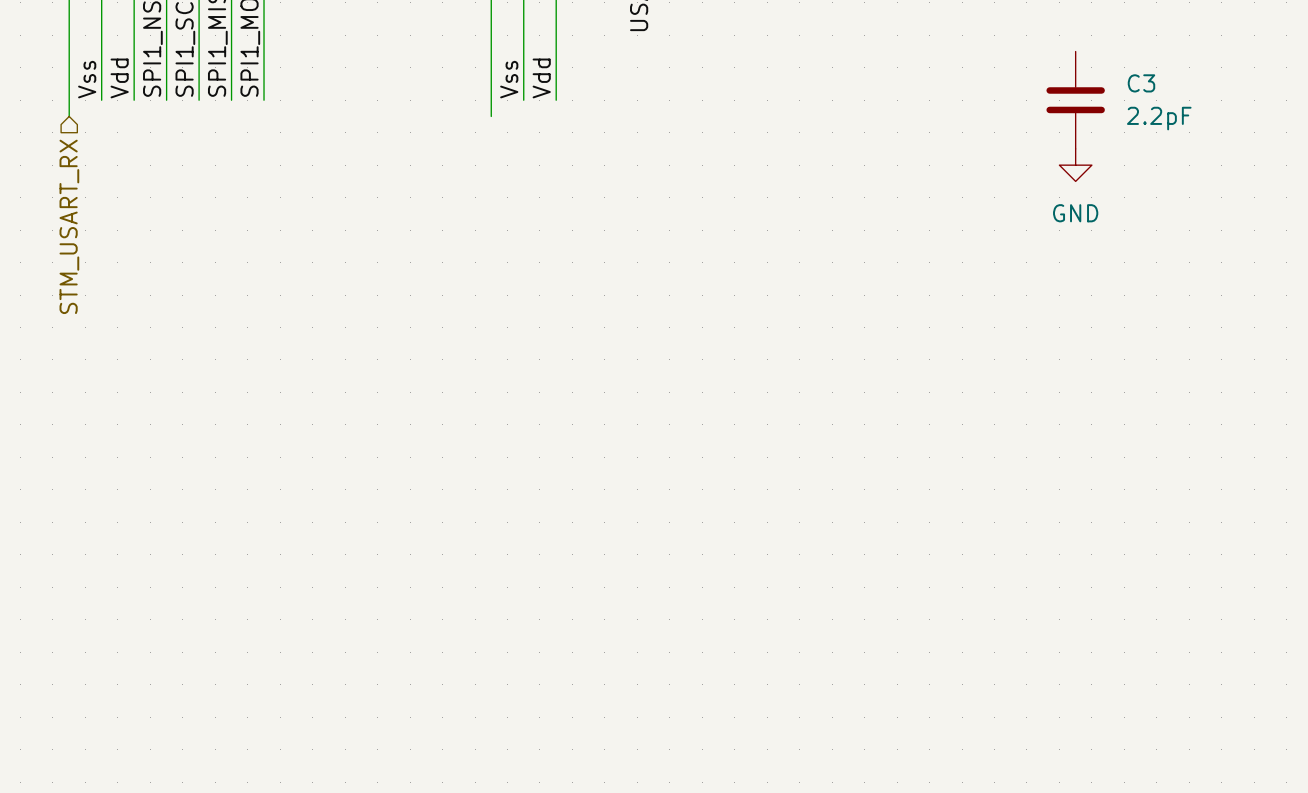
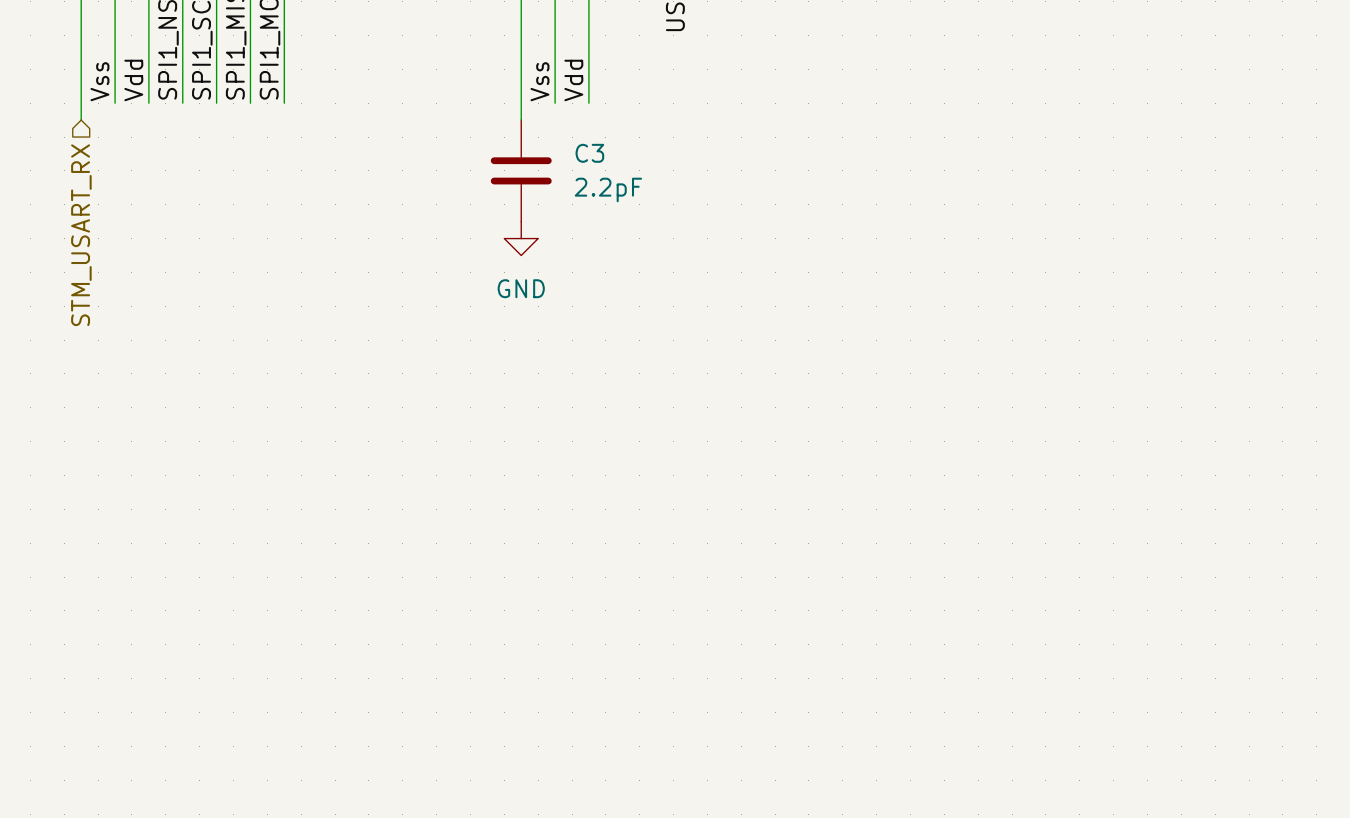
C3 position: (1075, 100) -> (521, 170)
power symbol: GND (1075, 165) -> none
power symbol: none -> GND (521, 238)

